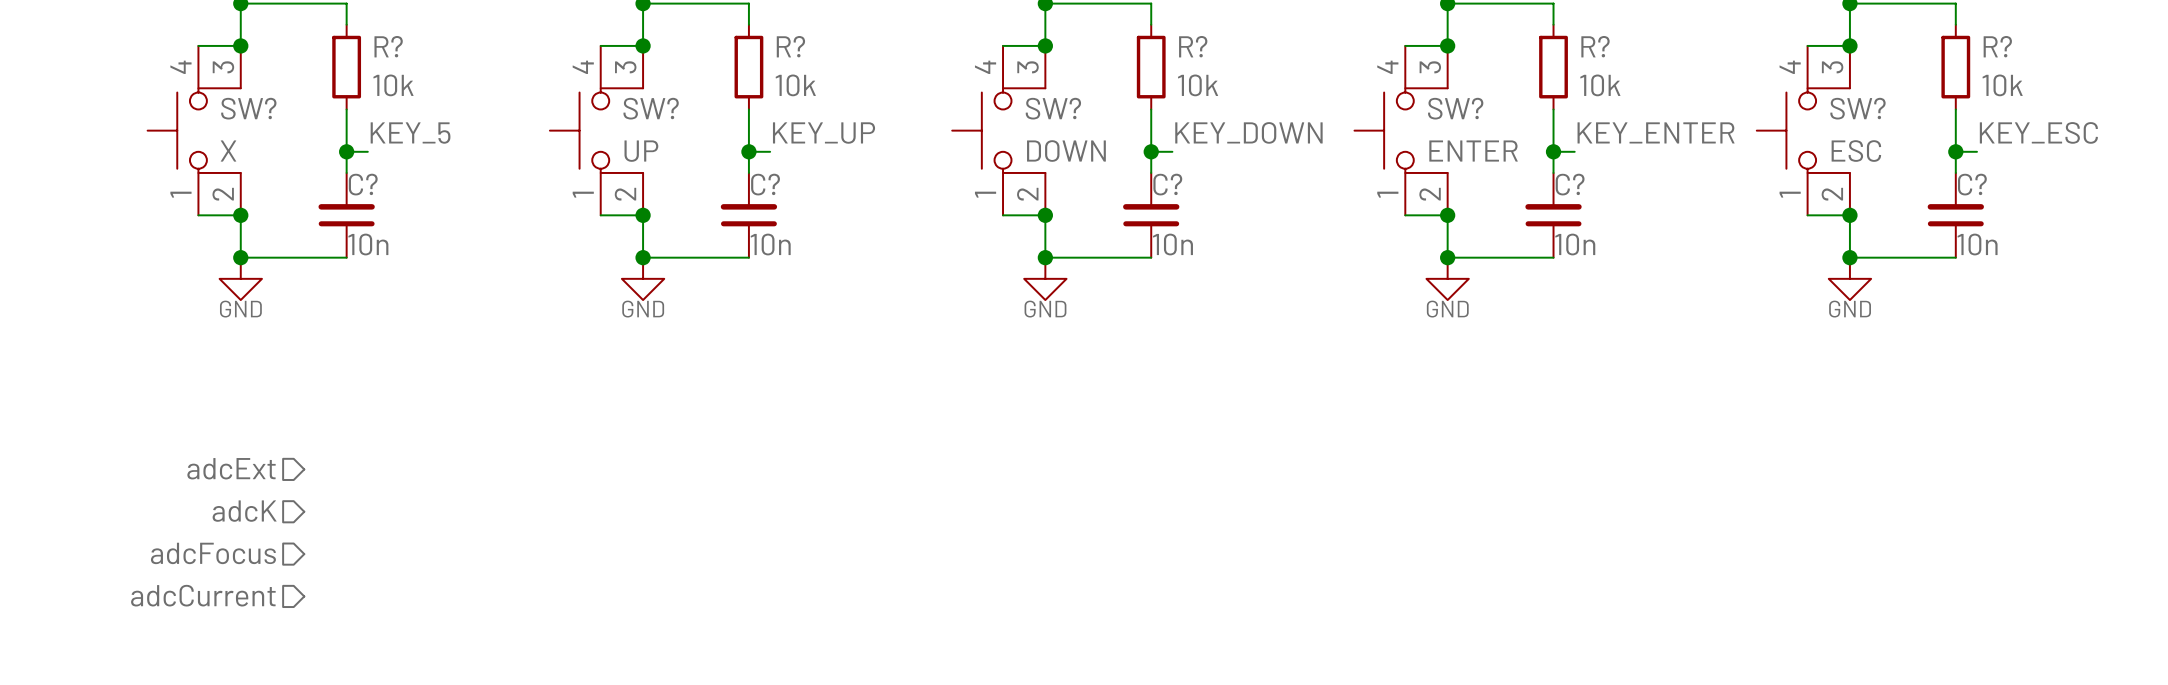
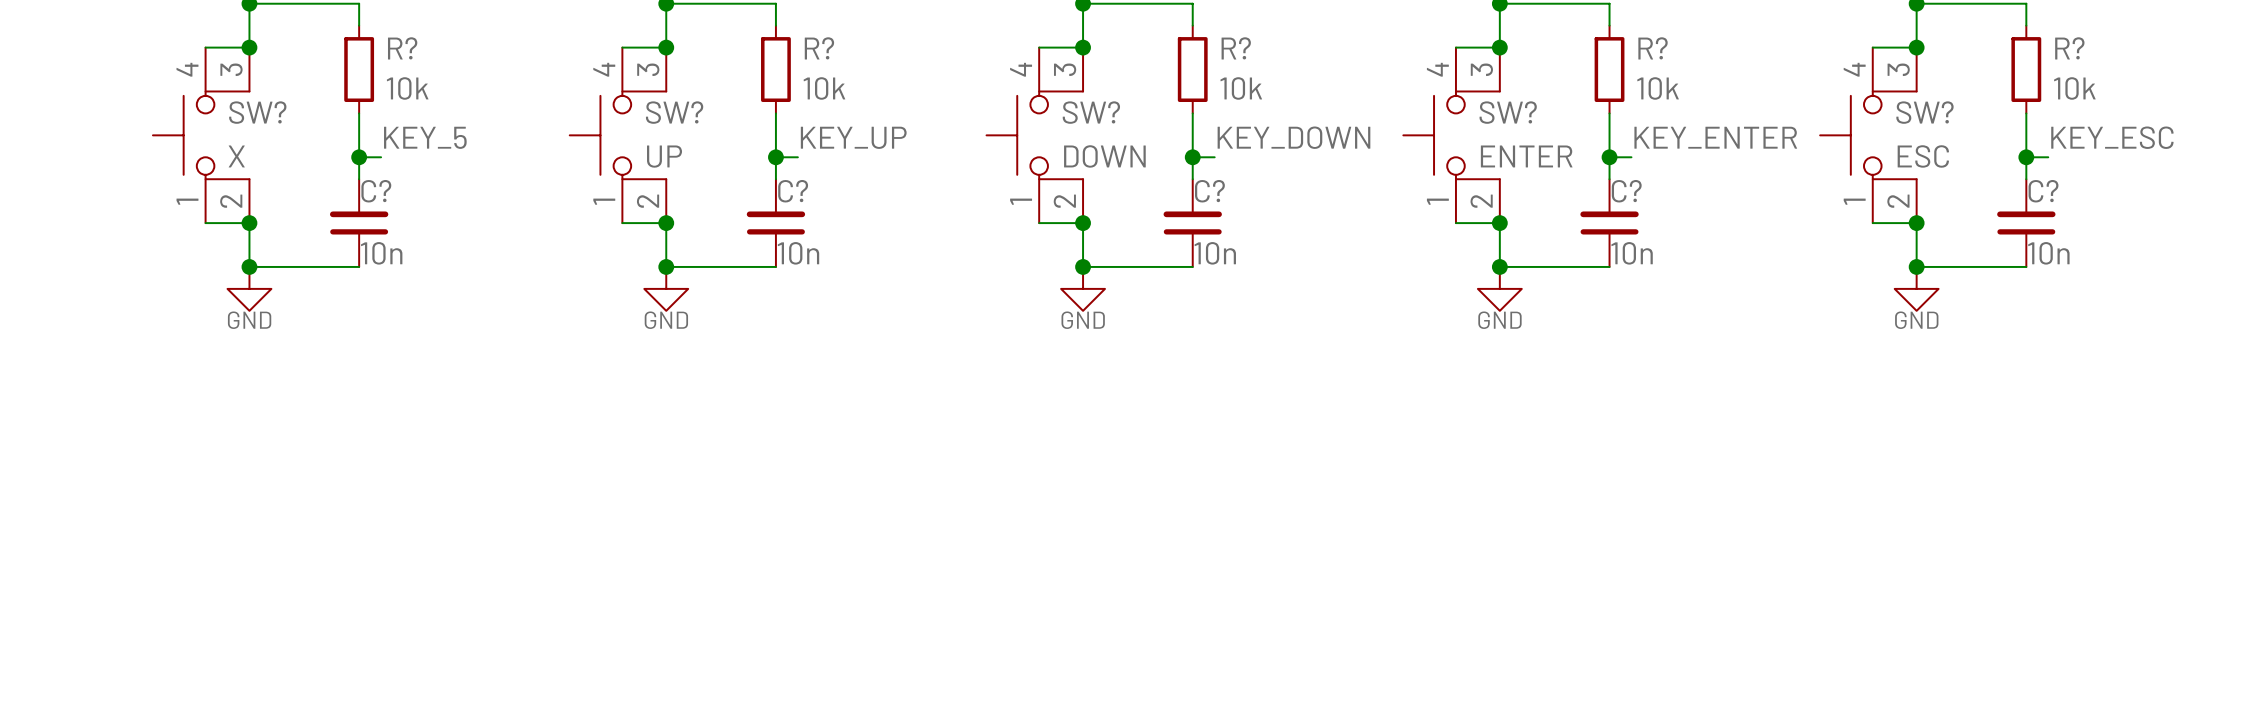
hierarchical label: adcExt (231, 468) -> none
hierarchical label: adcK (244, 511) -> none
hierarchical label: adcFocus (213, 553) -> none
hierarchical label: adcCurrent (203, 595) -> none

